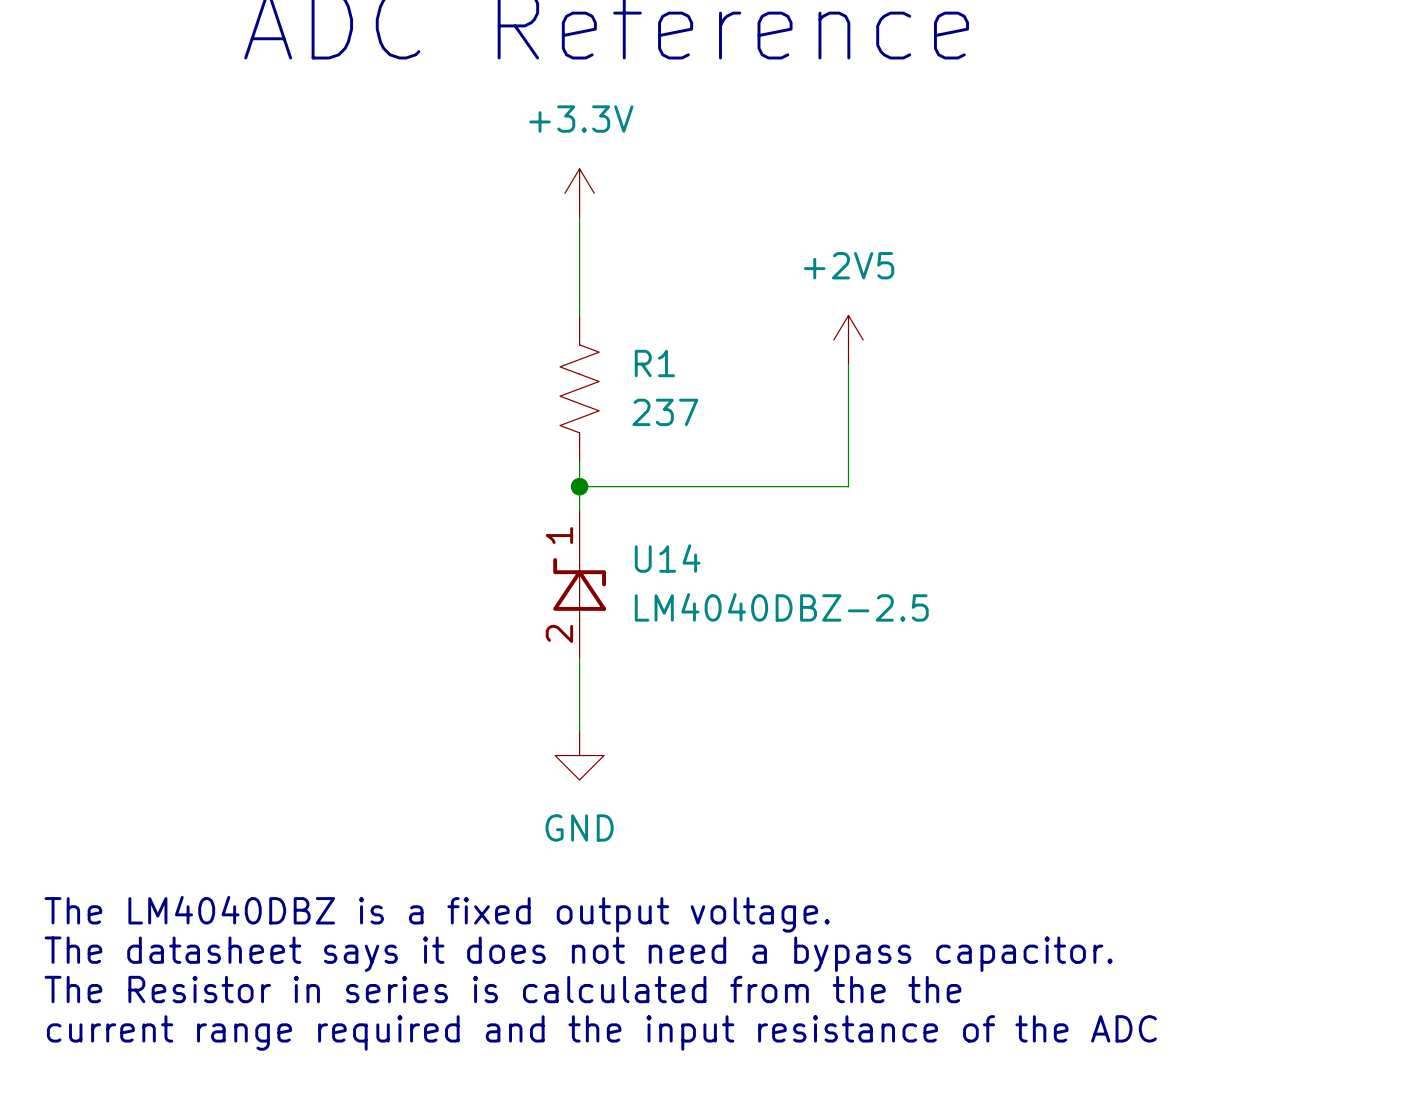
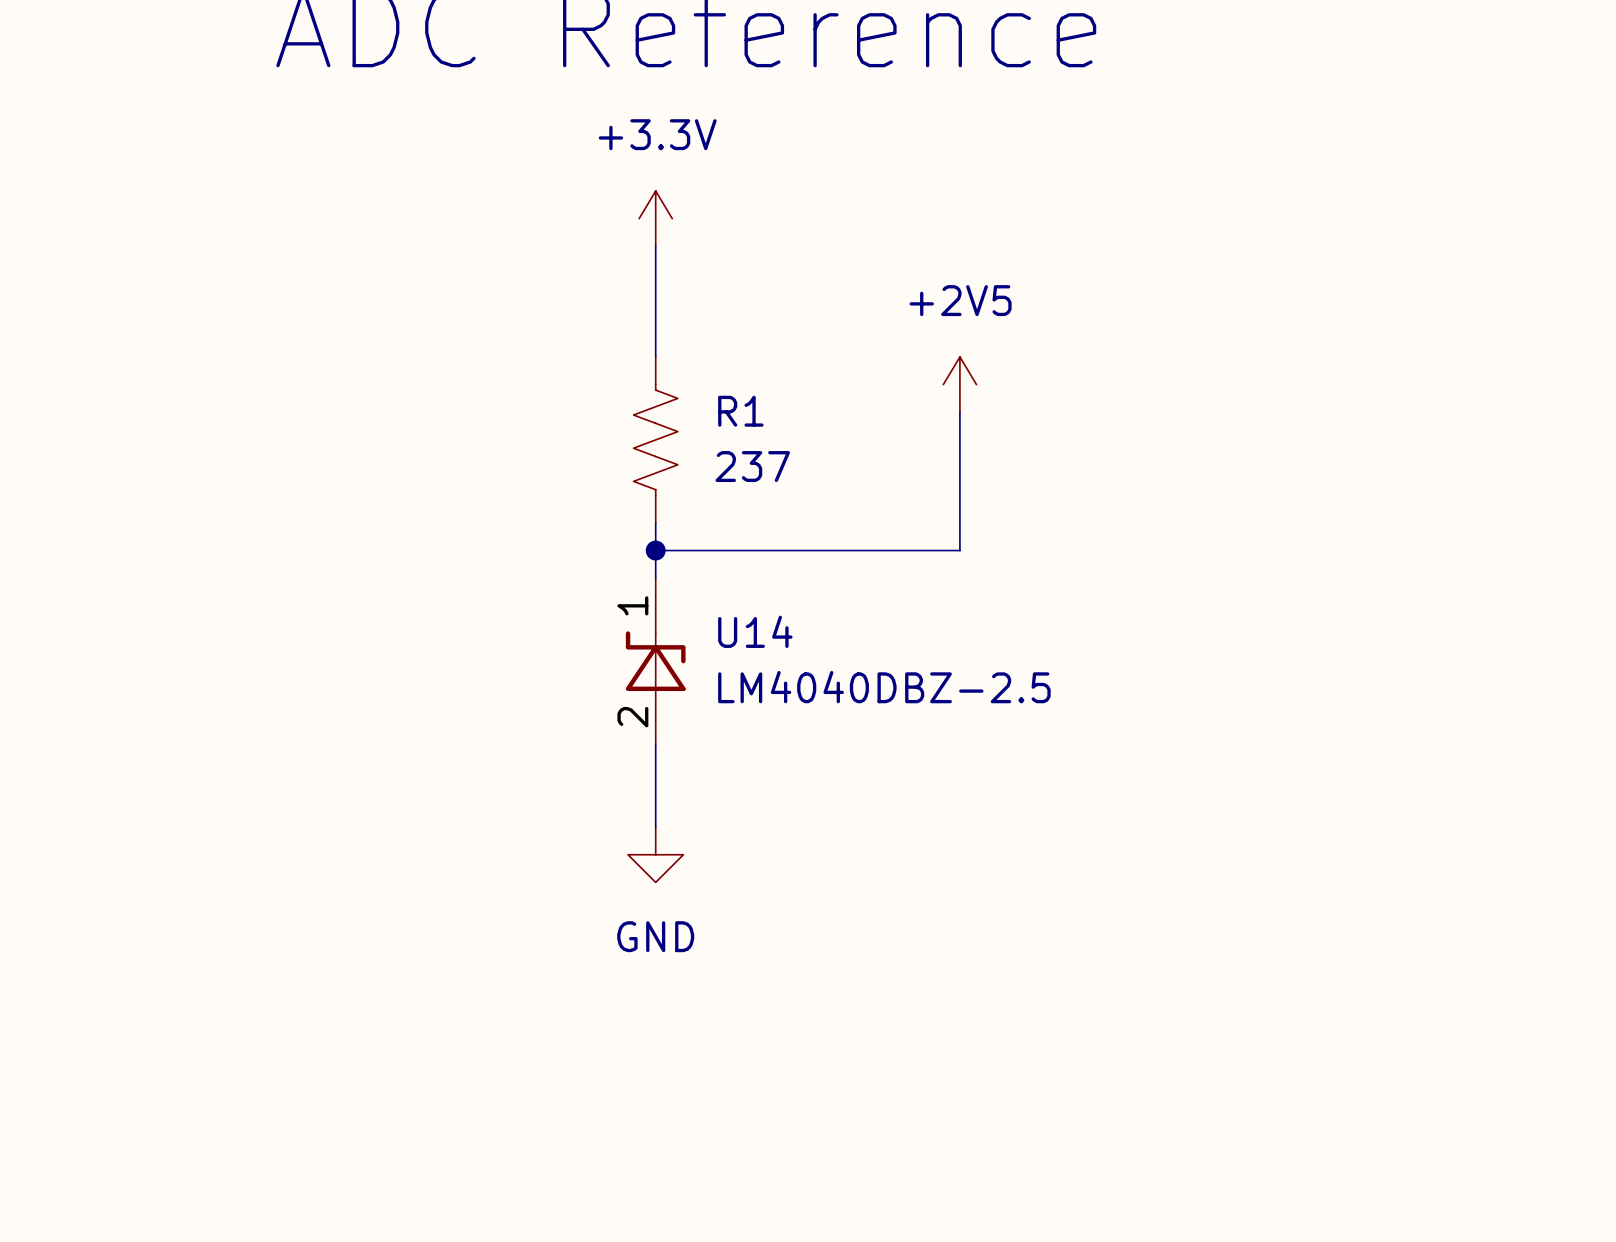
text: The LM4040DBZ is a fixed output voltage. (437, 914) -> none
text: The datasheet says it does not need a bypass capacitor. (578, 954) -> none
text: The Resistor in series is calculated from the the (502, 989) -> none
text: current range required and the input resistance of the ADC (601, 1032) -> none

